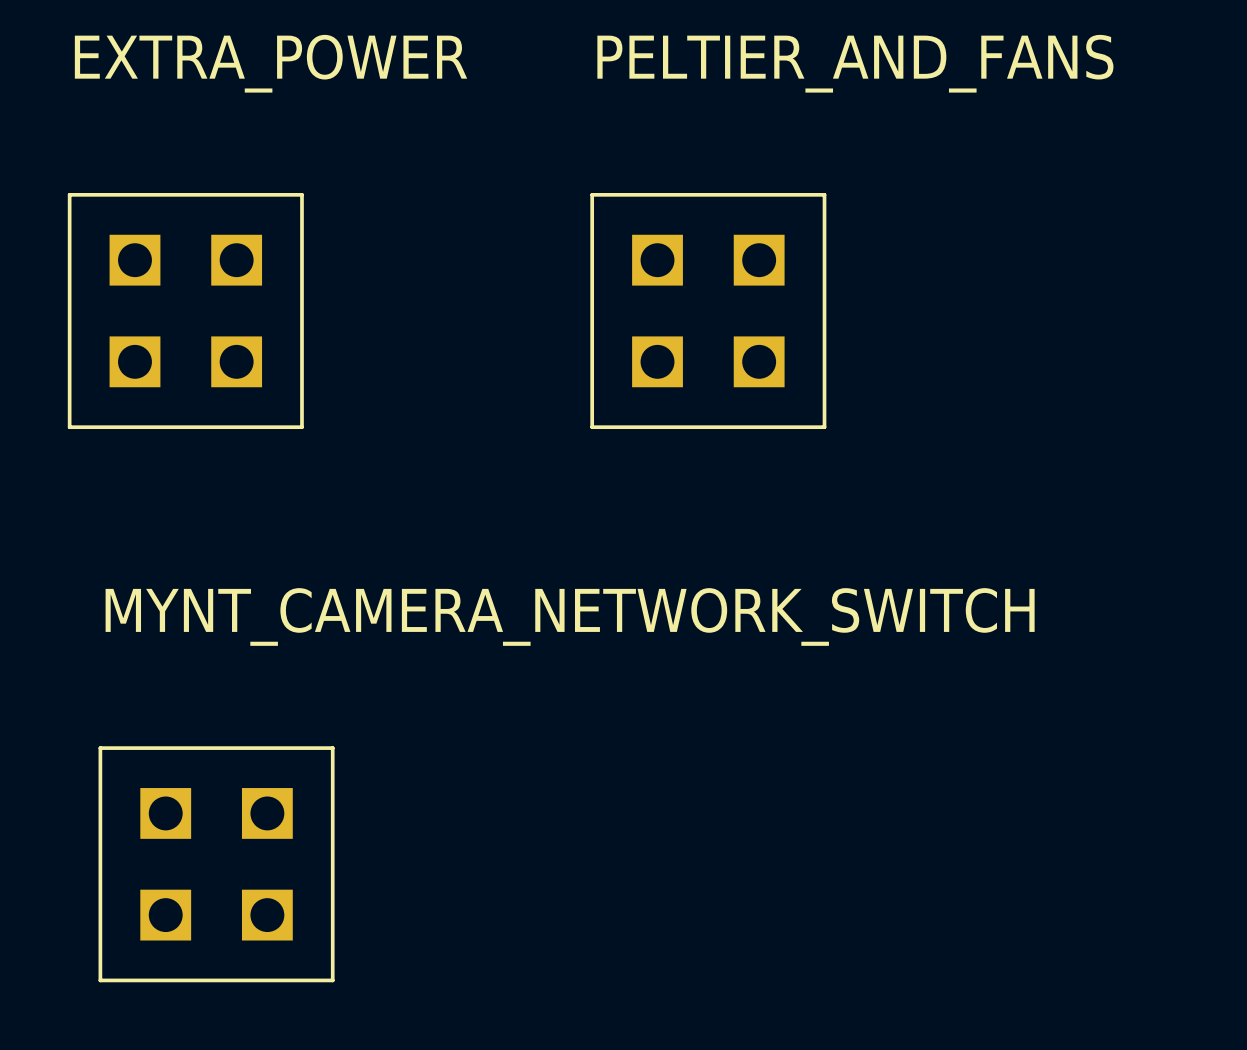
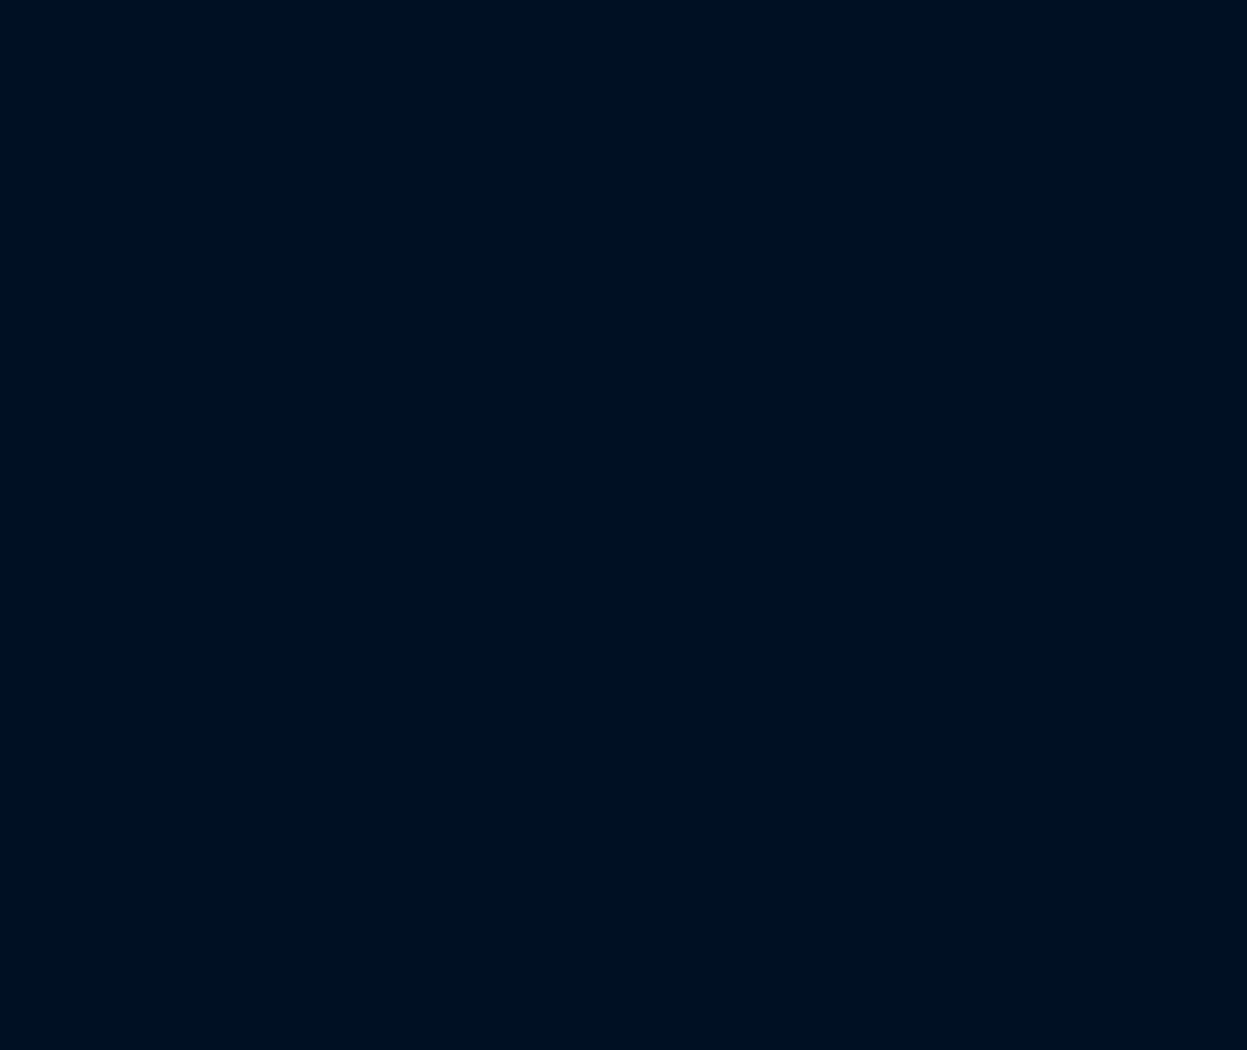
EXTRA_POWER: (185, 311) -> none
PELTIER_AND_FANS: (708, 311) -> none
MYNT_CAMERA_NETWORK_SWITCH: (216, 864) -> none

